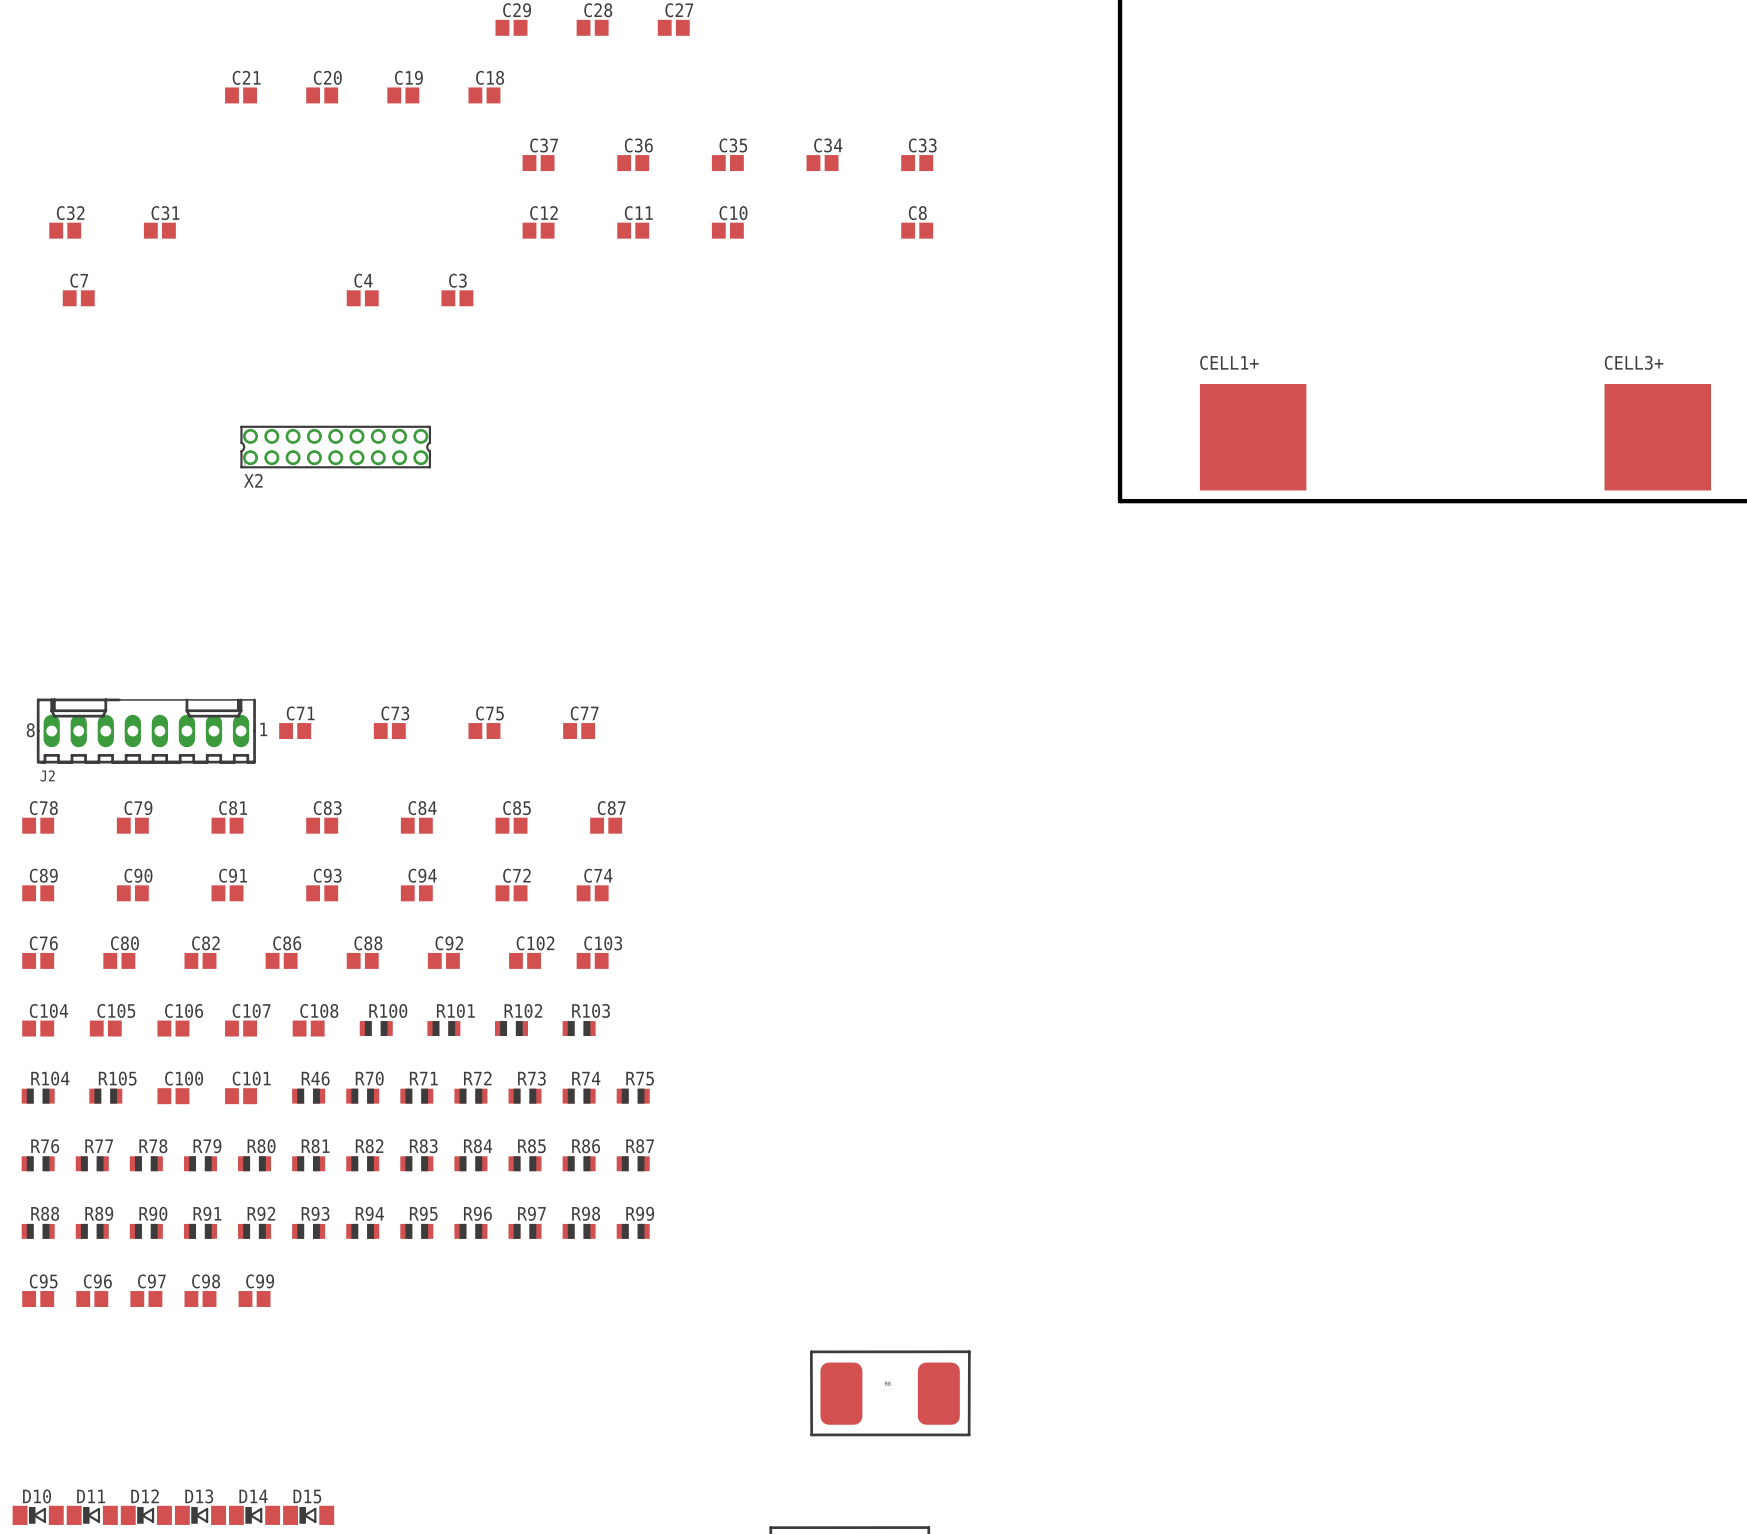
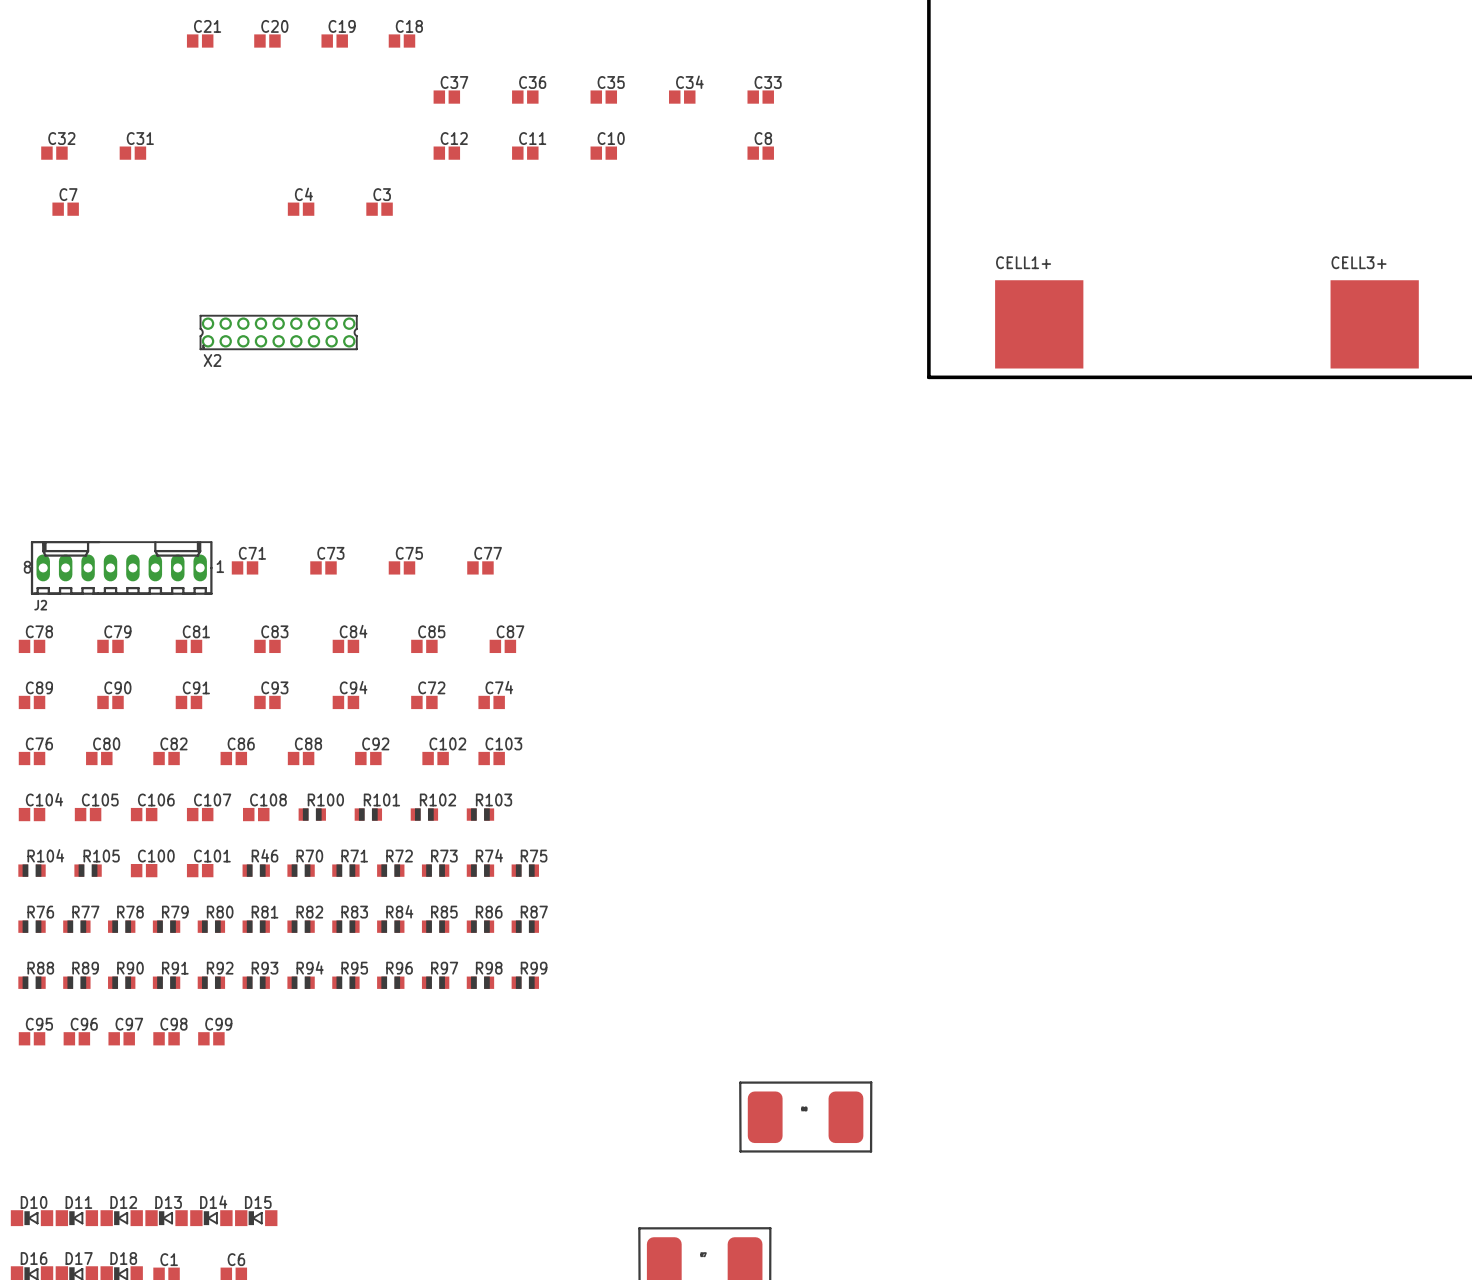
part position: (890, 1393) -> (805, 1116)

